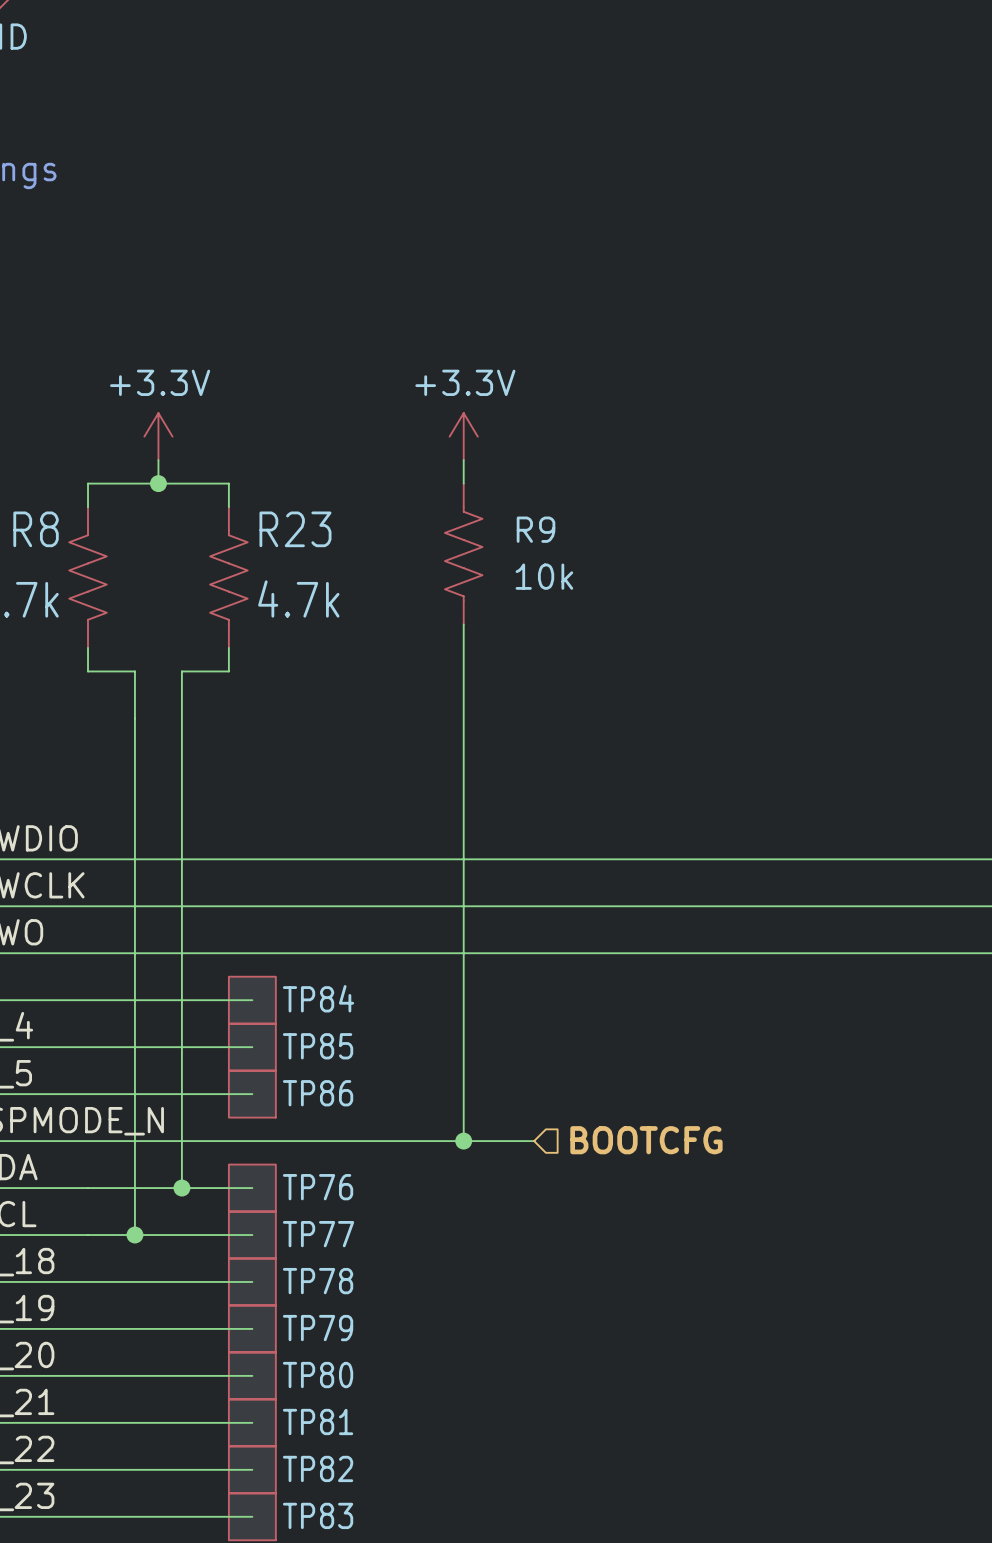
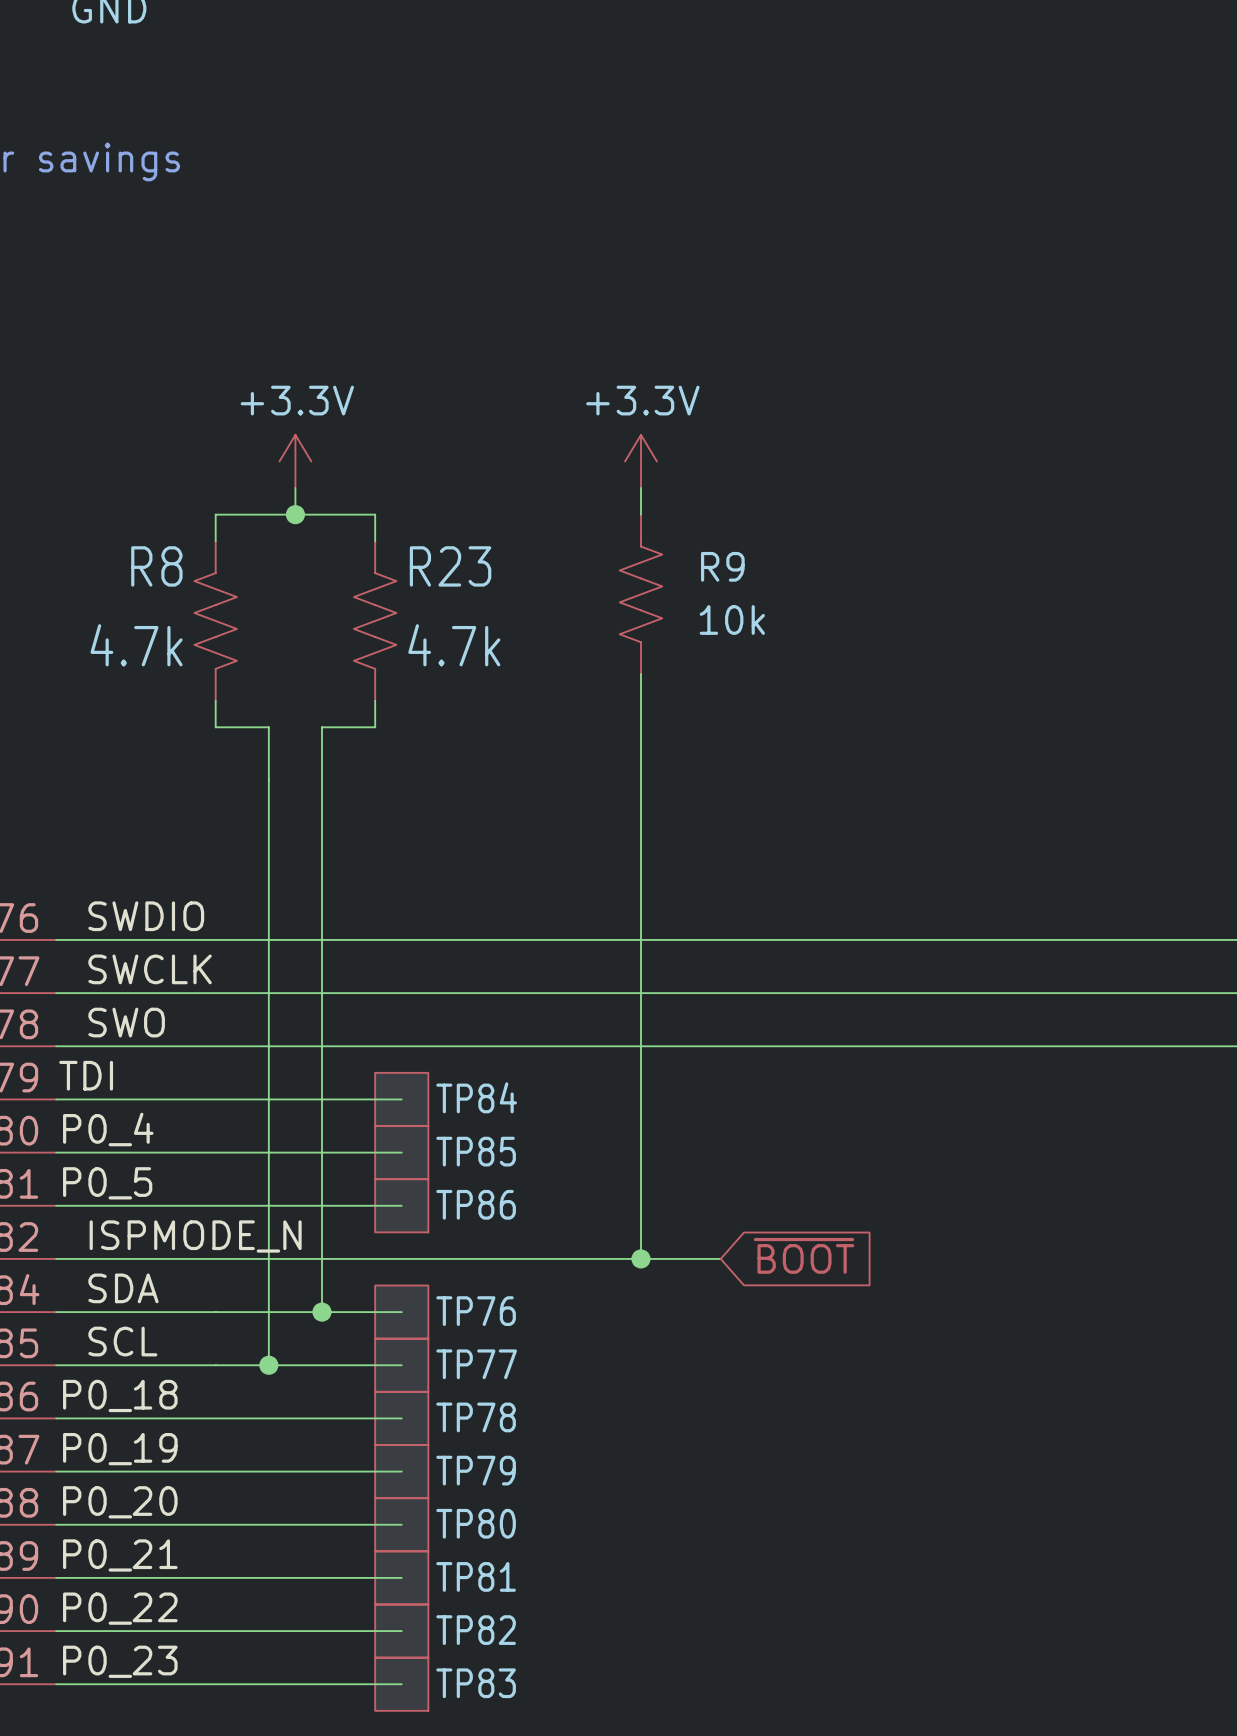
global label: none -> ~{BOOT} (804, 1255)
hierarchical label: BOOTCFG (646, 1140) -> none

